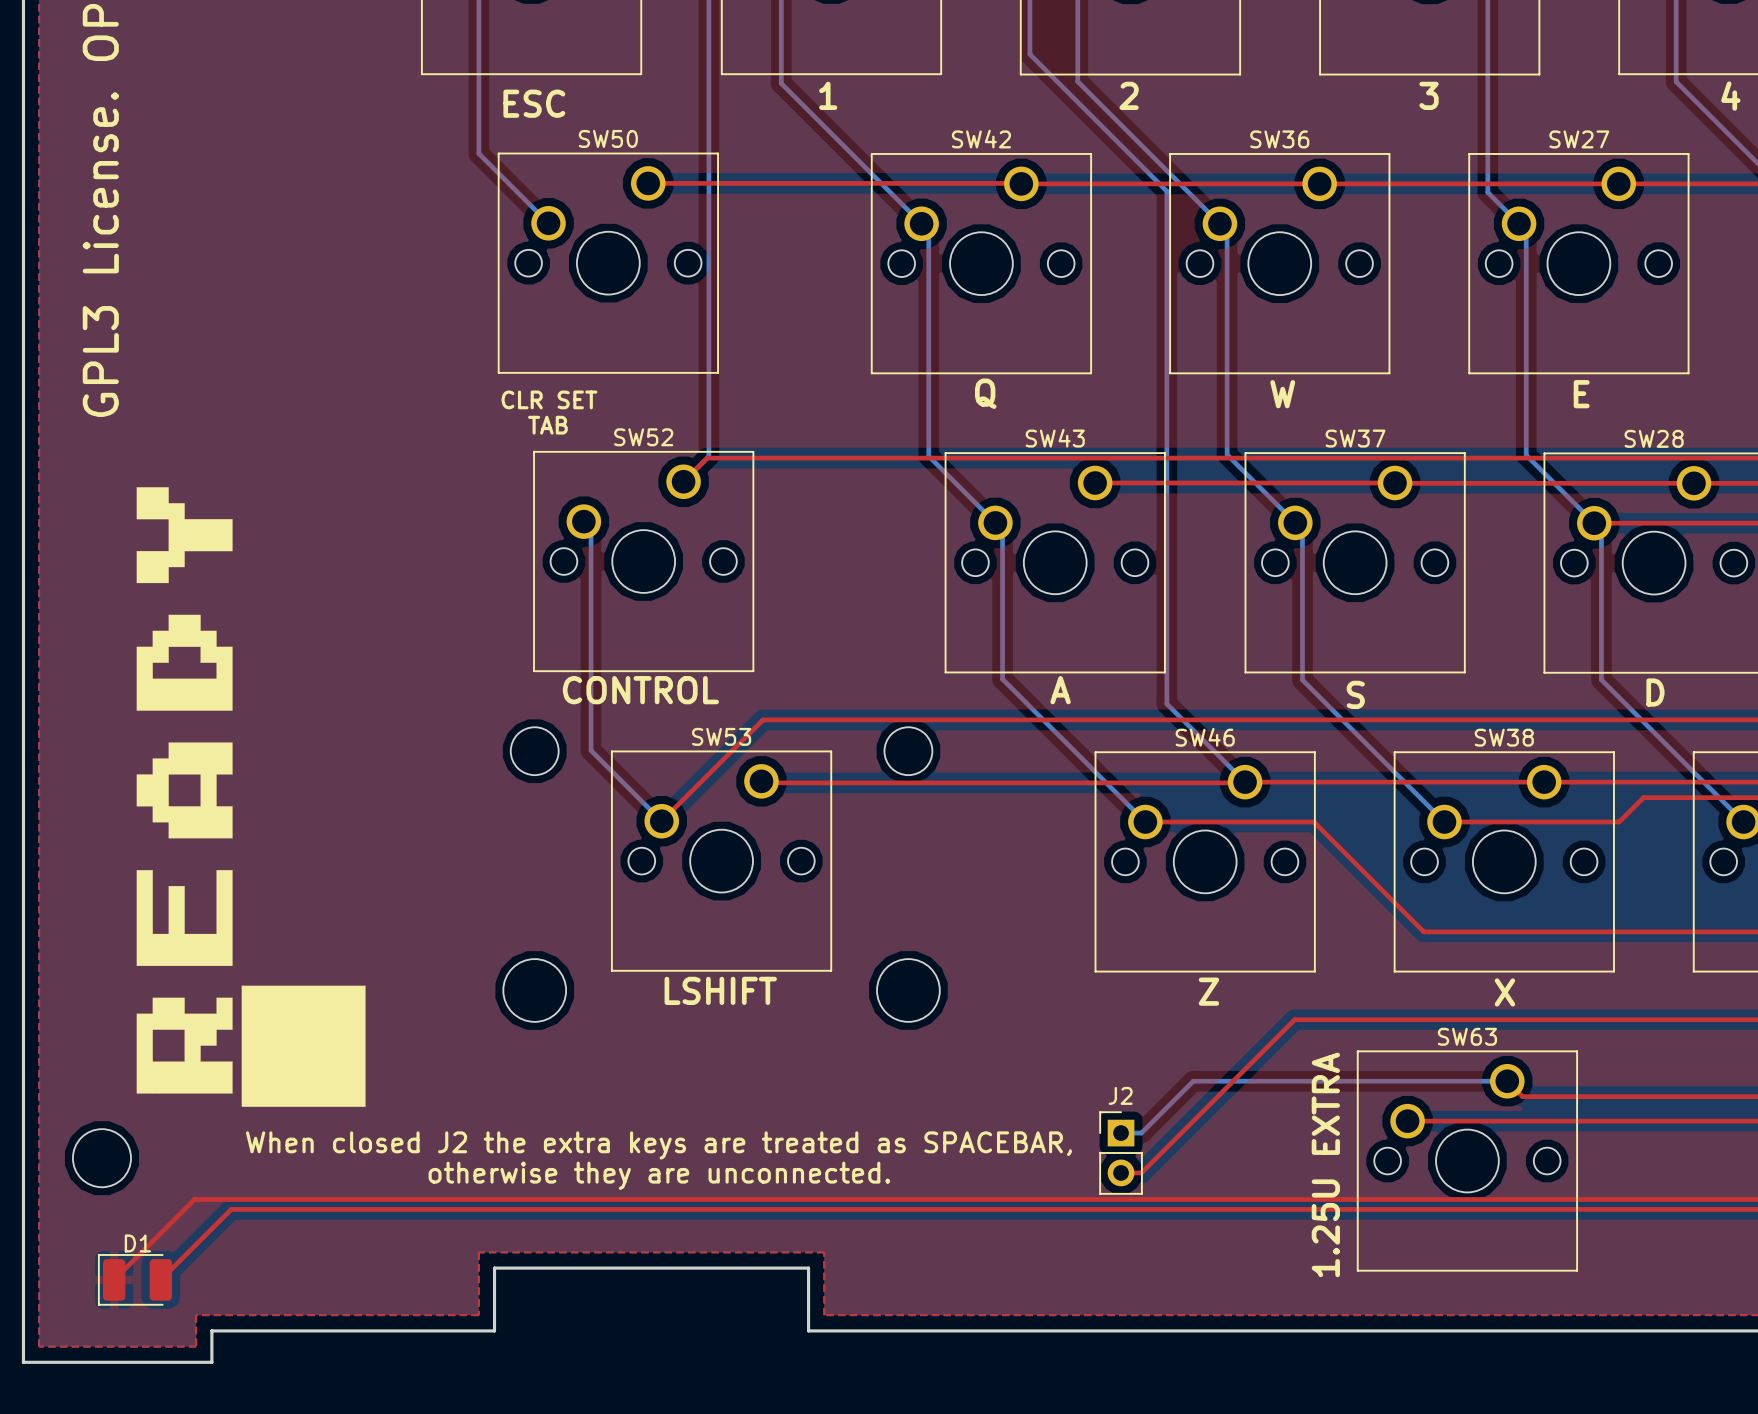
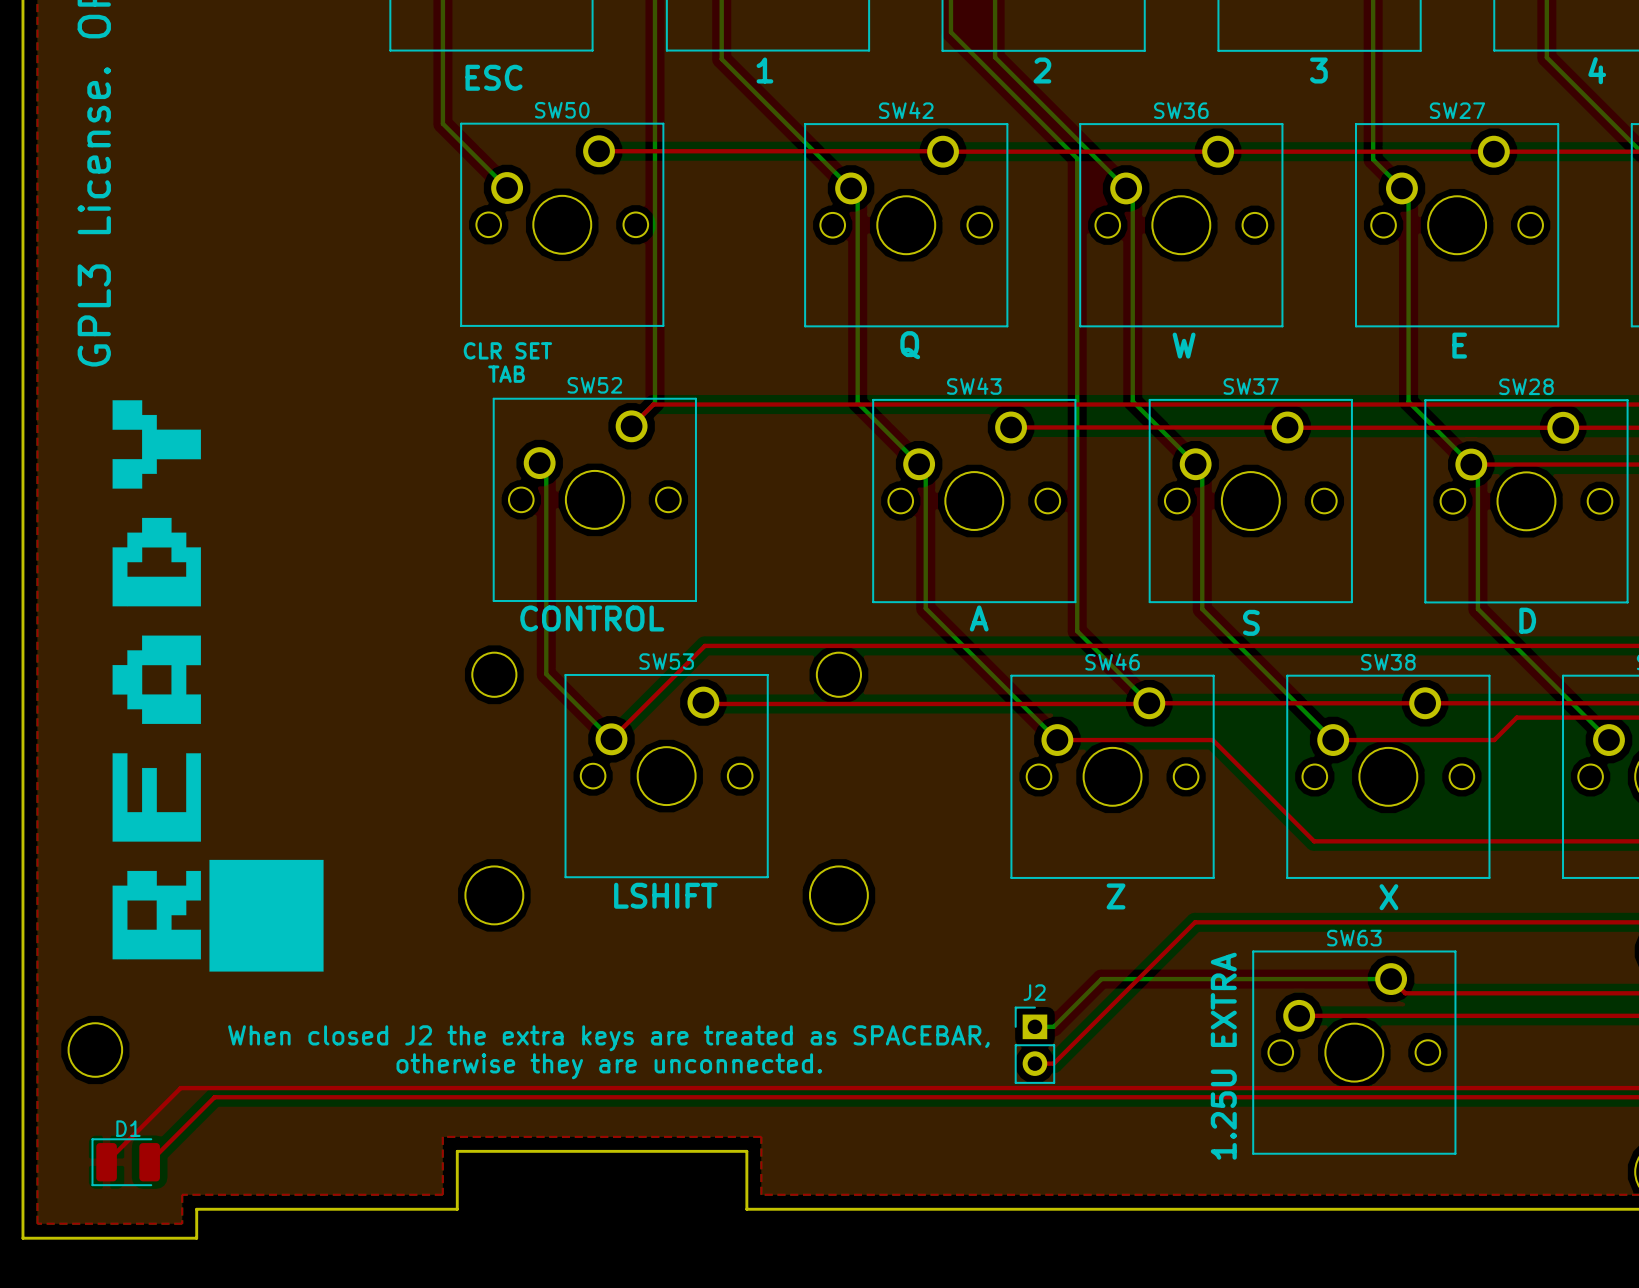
drawing position: (251, 797) -> (218, 685)

